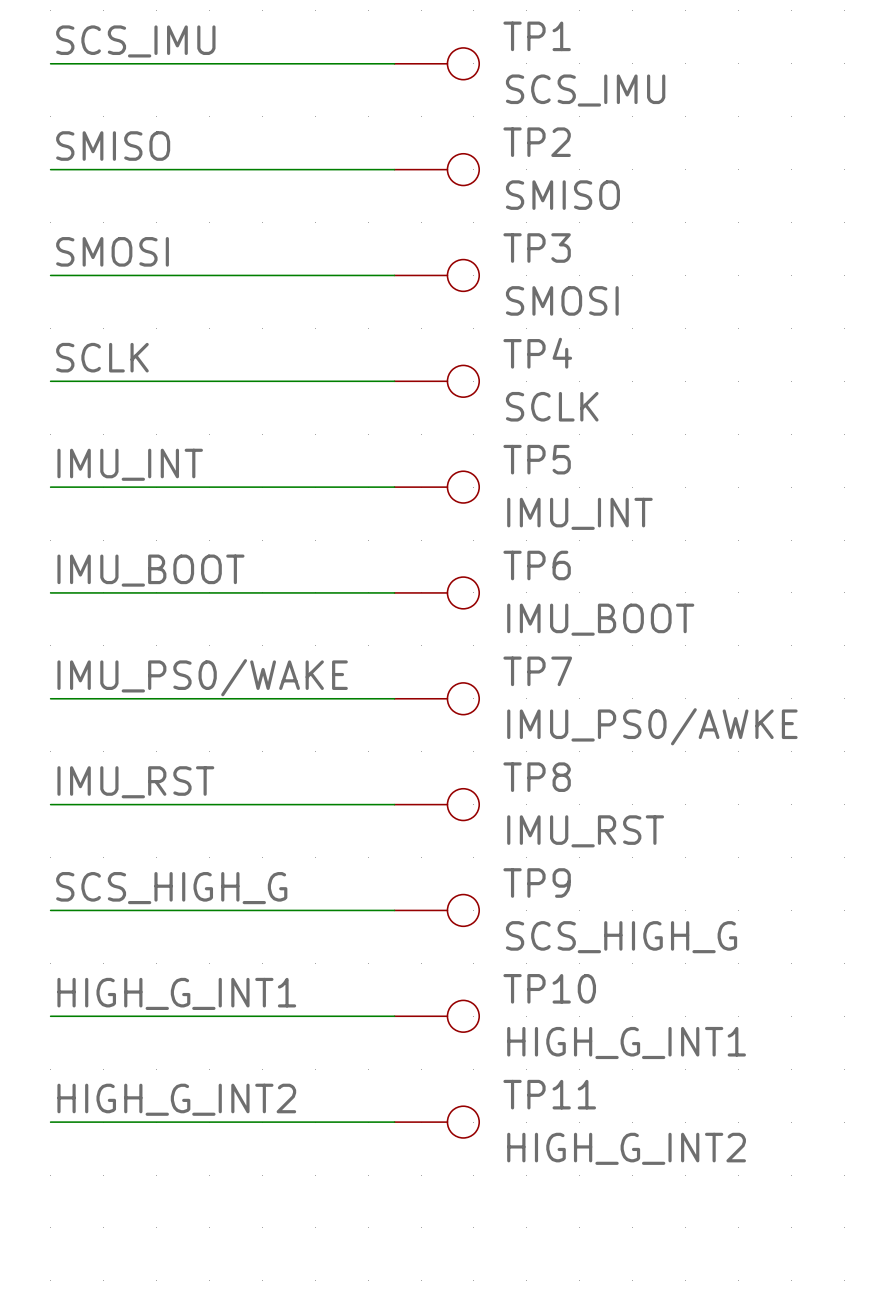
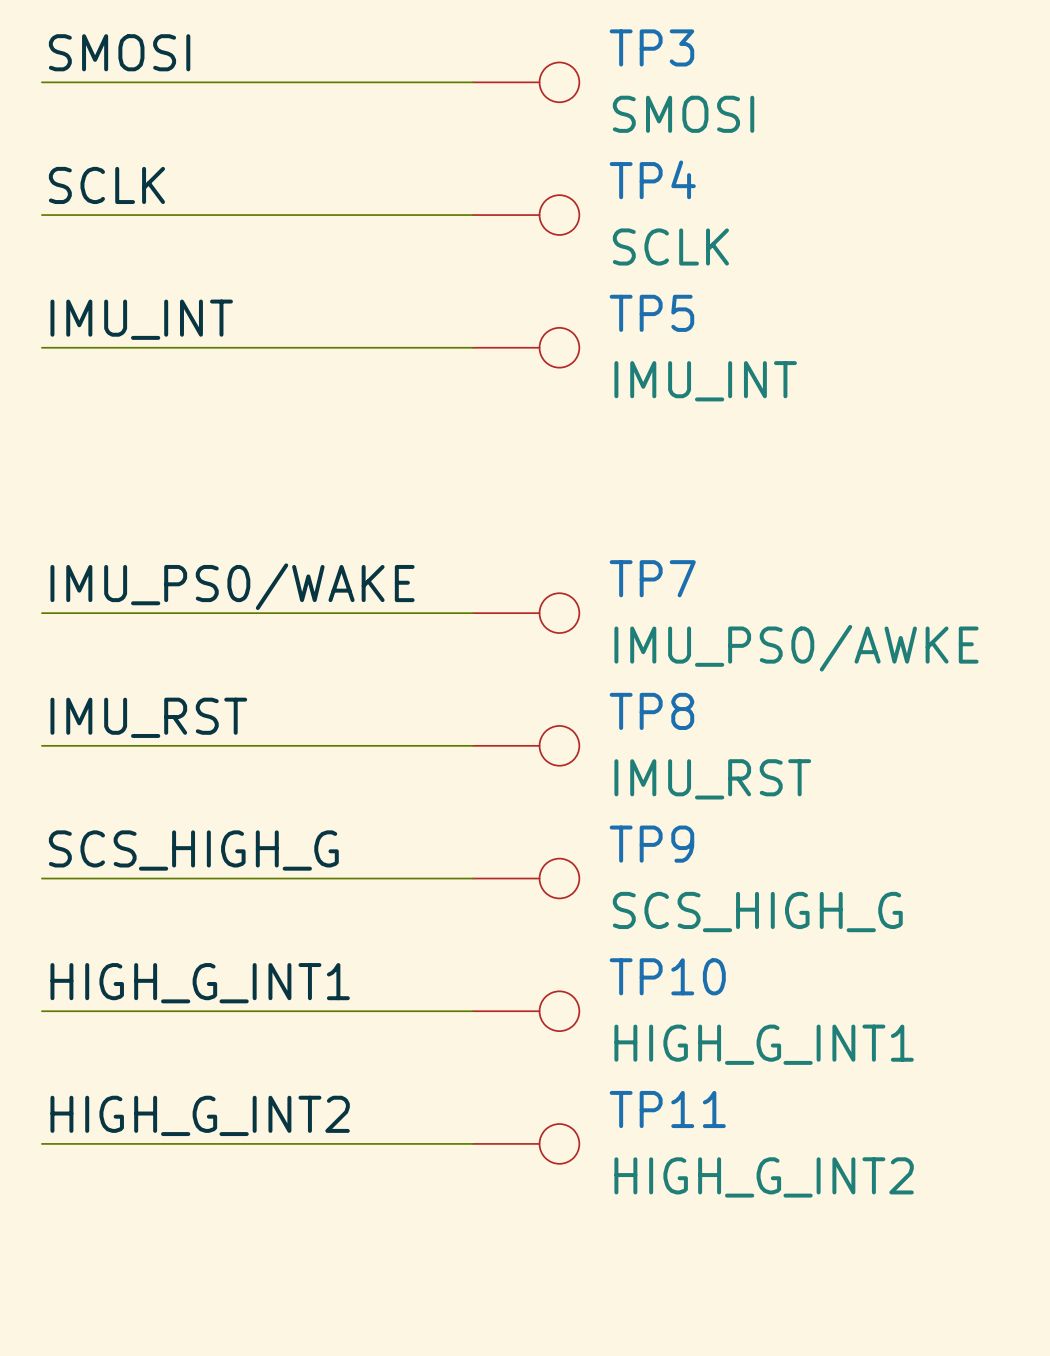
label: IMU_BOOT (150, 570) -> none
wire: (50, 592) (394, 592) -> none
TP6: IMU_BOOT (436, 592) -> none

